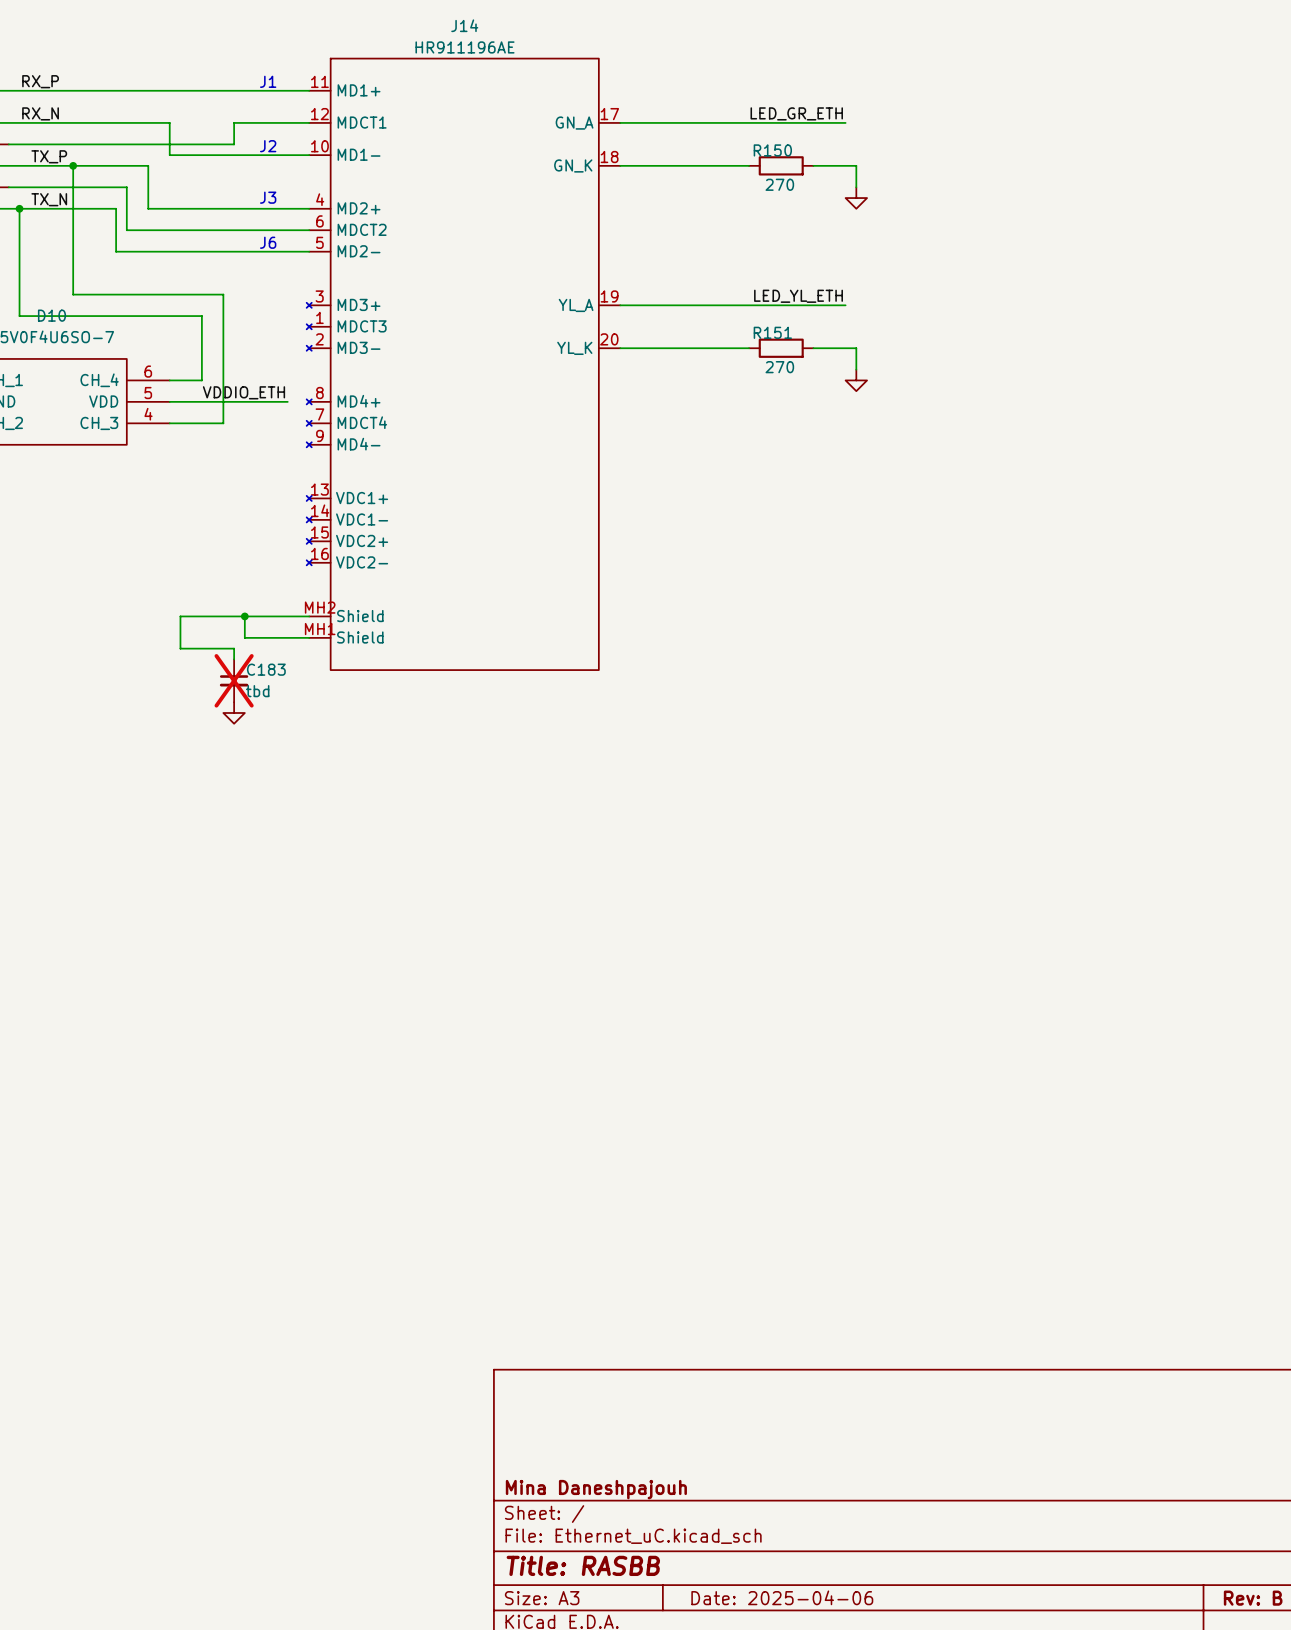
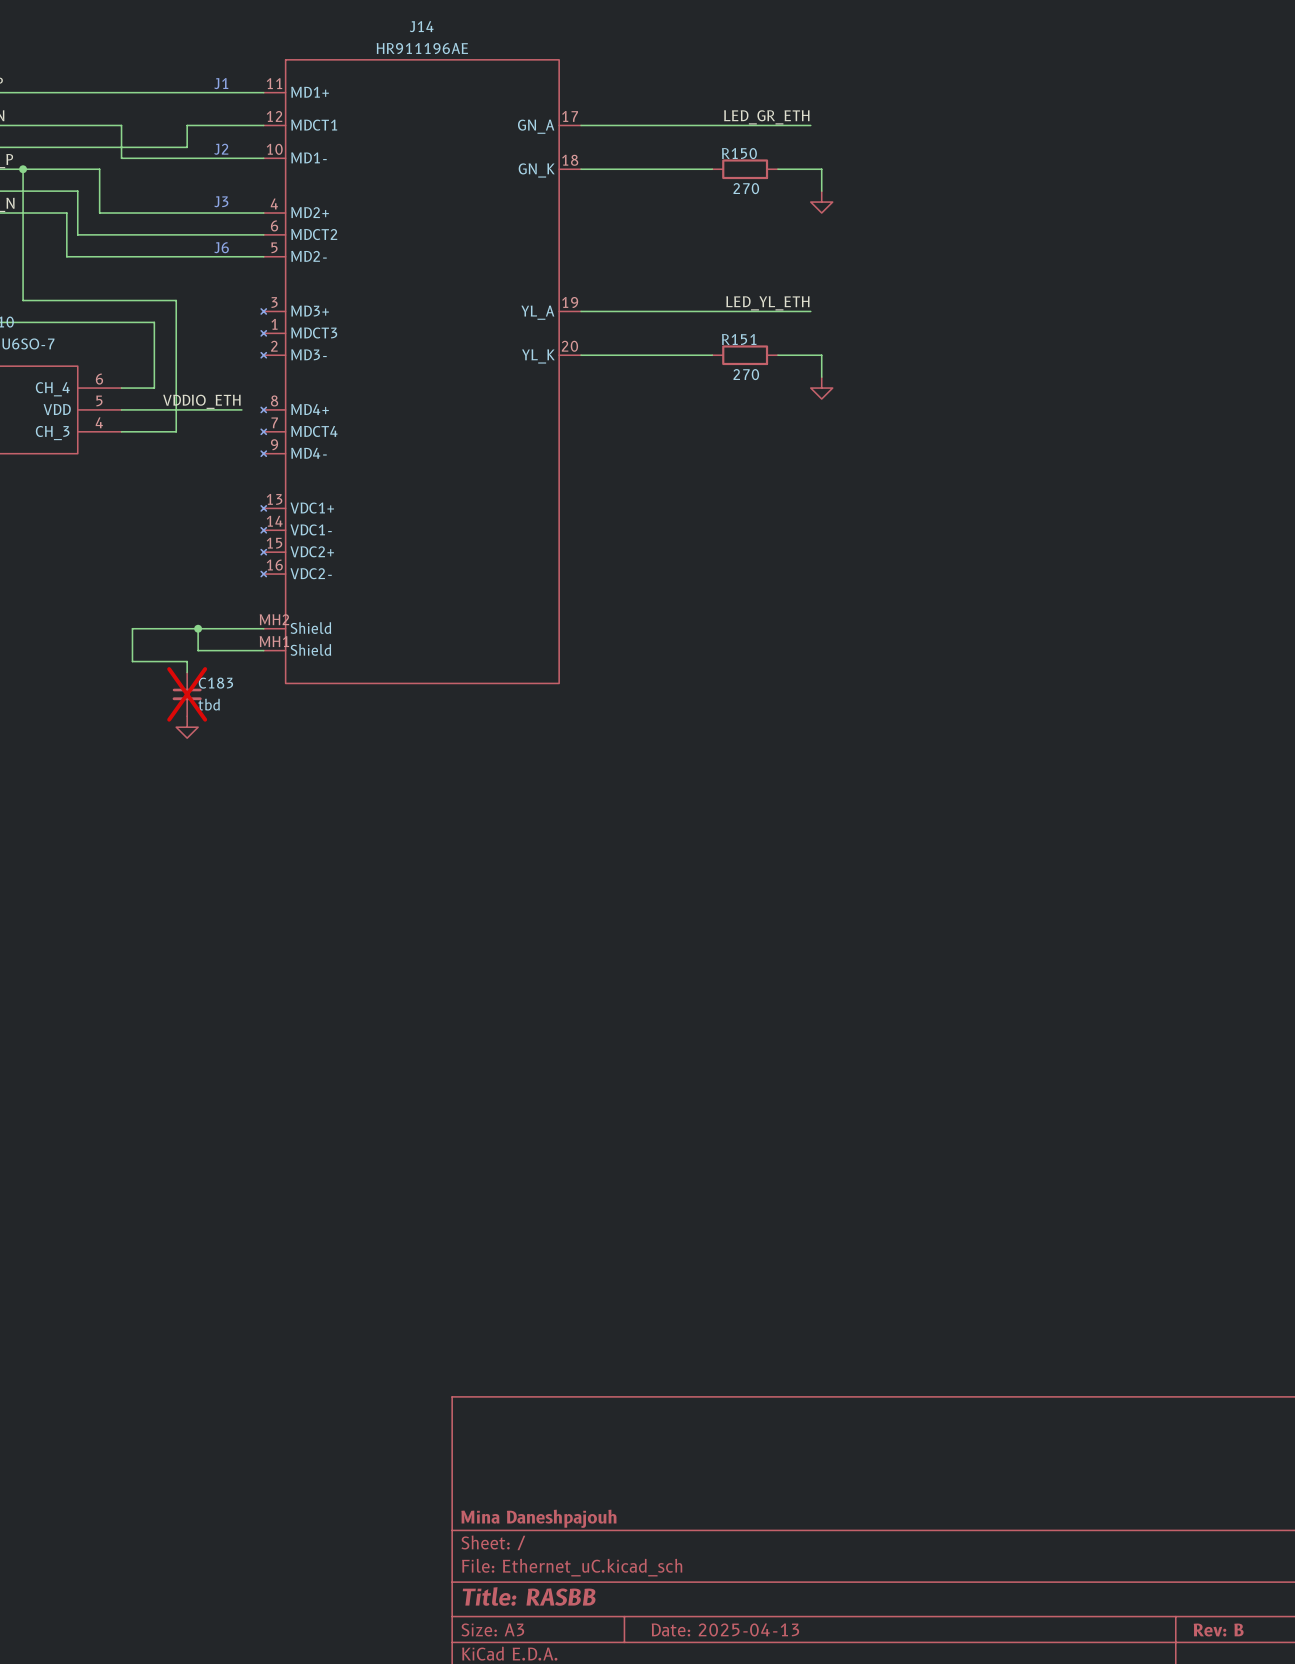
title block: Date: 2025-04-06 (782, 1597) -> Date: 2025-04-13 (725, 1629)

